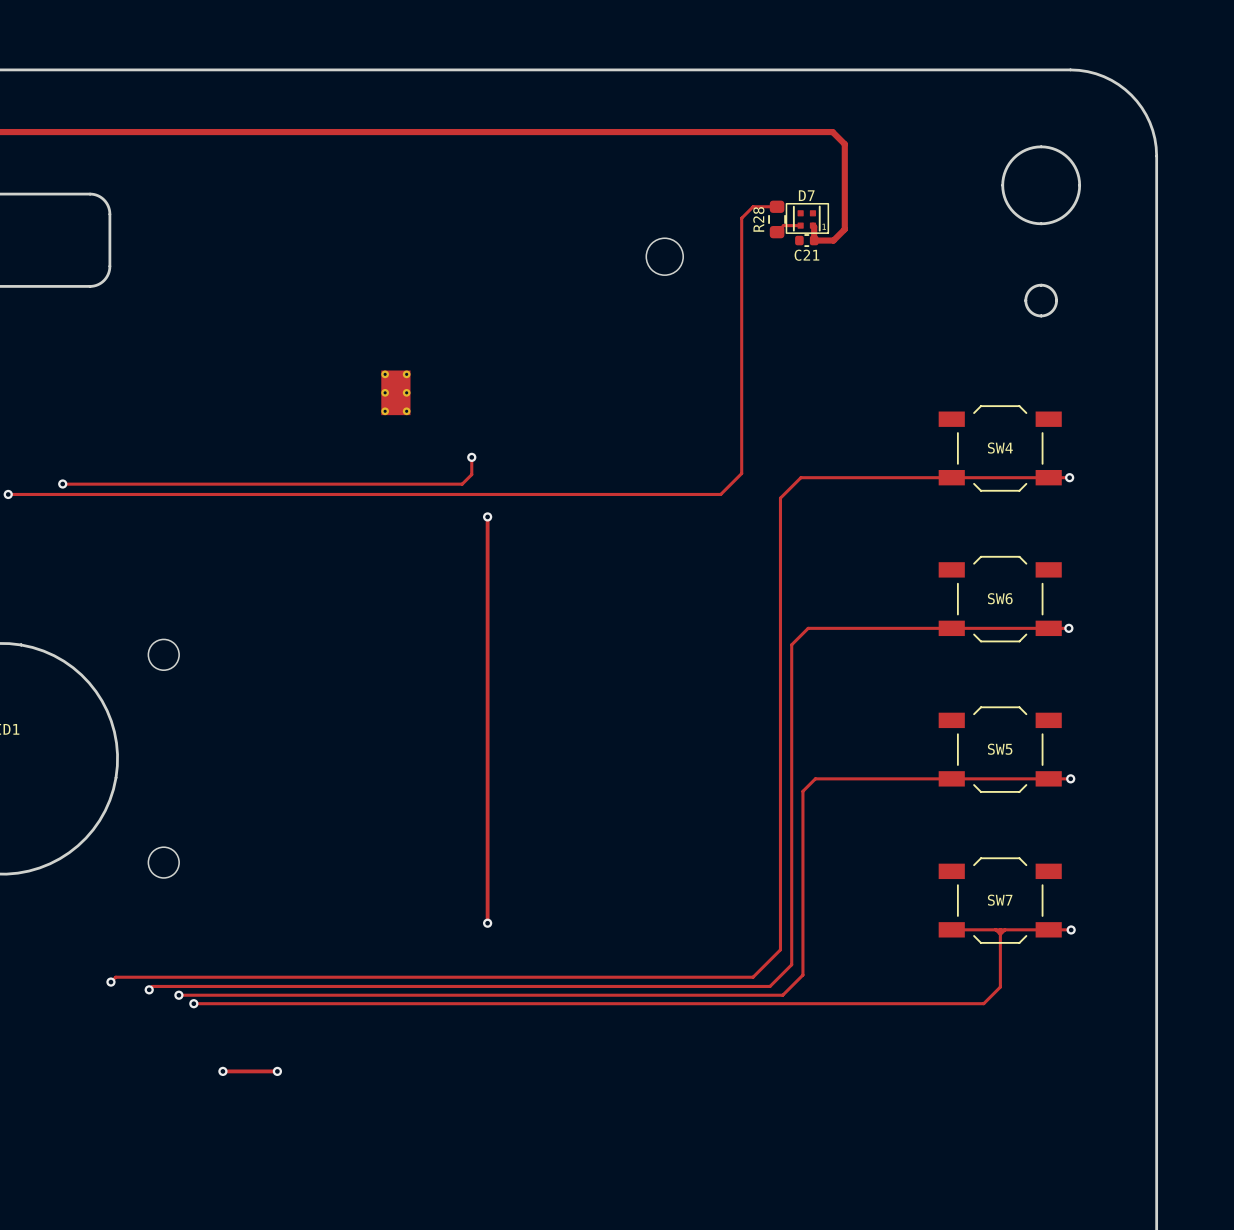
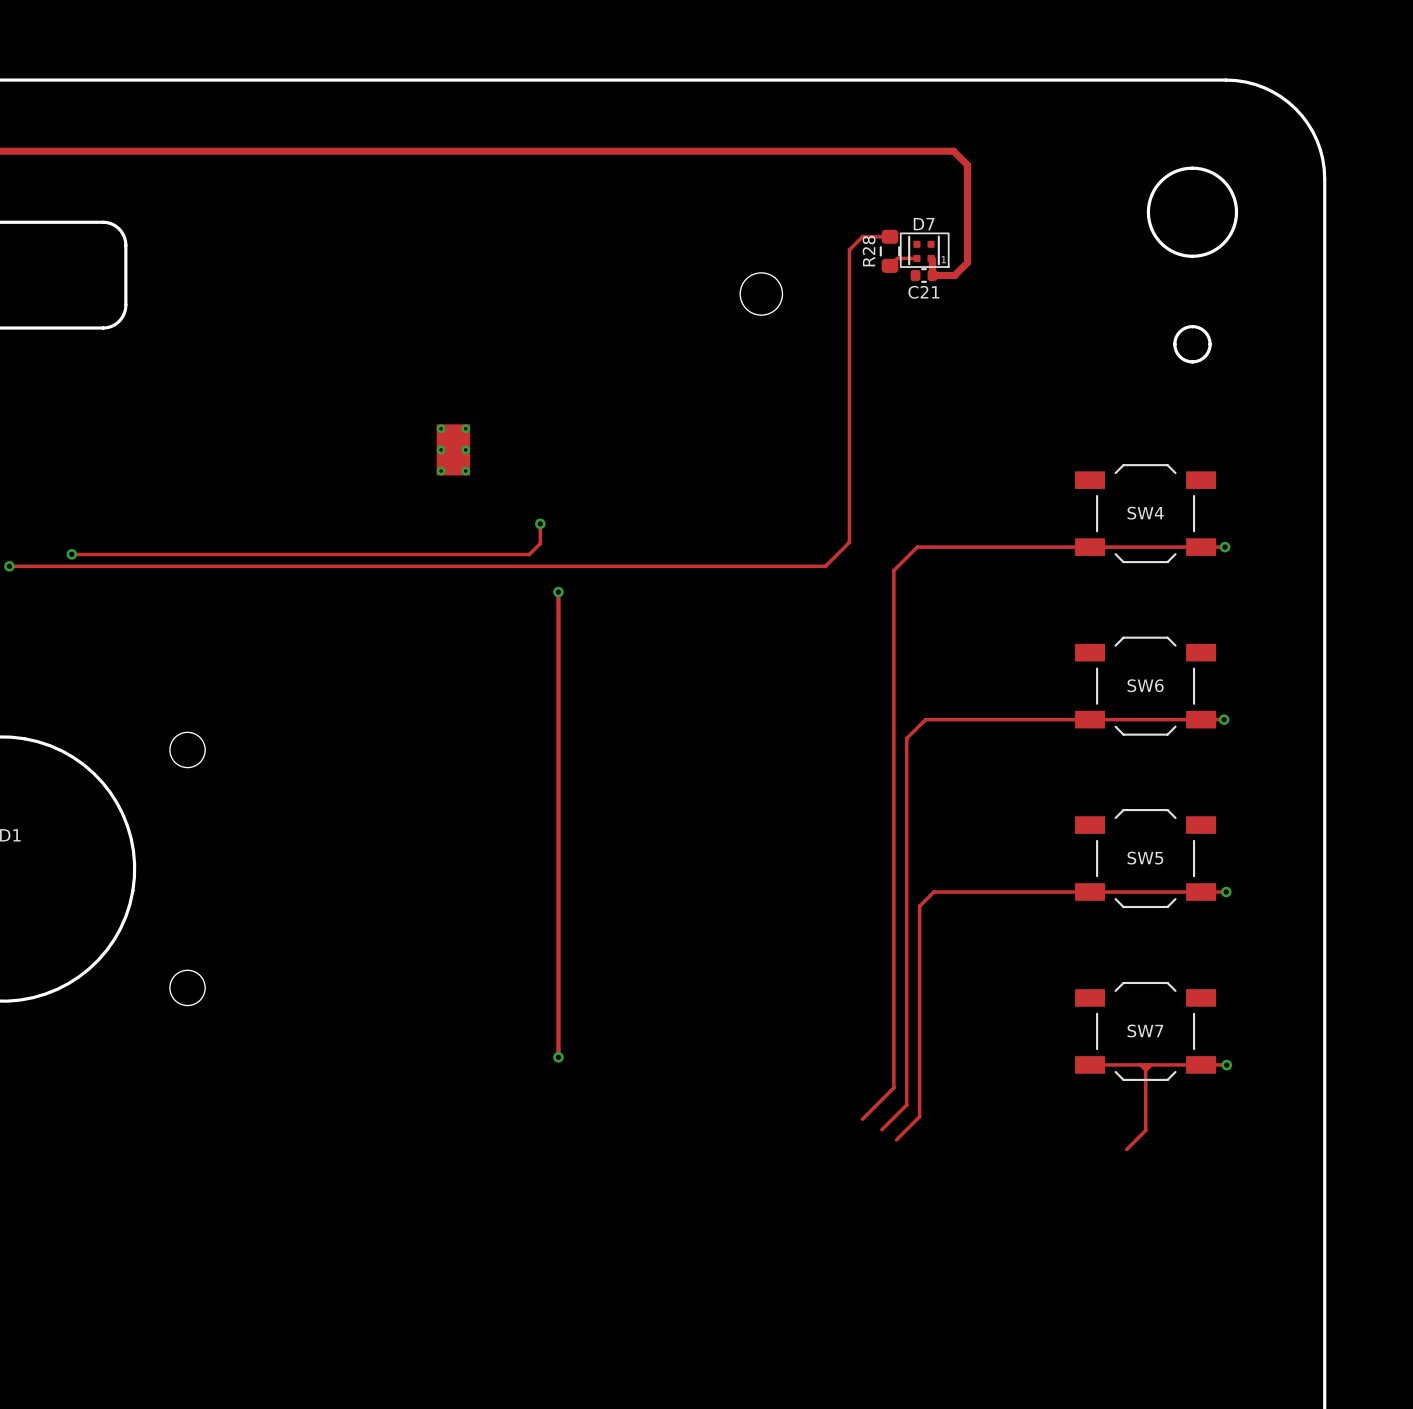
track: (753, 977) (115, 977) (110, 982) -> none
via: (110, 982) -> none
track: (770, 986) (152, 986) (149, 989) -> none
via: (149, 989) -> none
track: (178, 995) (782, 995) -> none
via: (178, 995) -> none
track: (193, 1003) (983, 1003) -> none
via: (193, 1003) -> none
track: (222, 1071) (277, 1071) -> none
via: (222, 1071) -> none
via: (277, 1071) -> none

